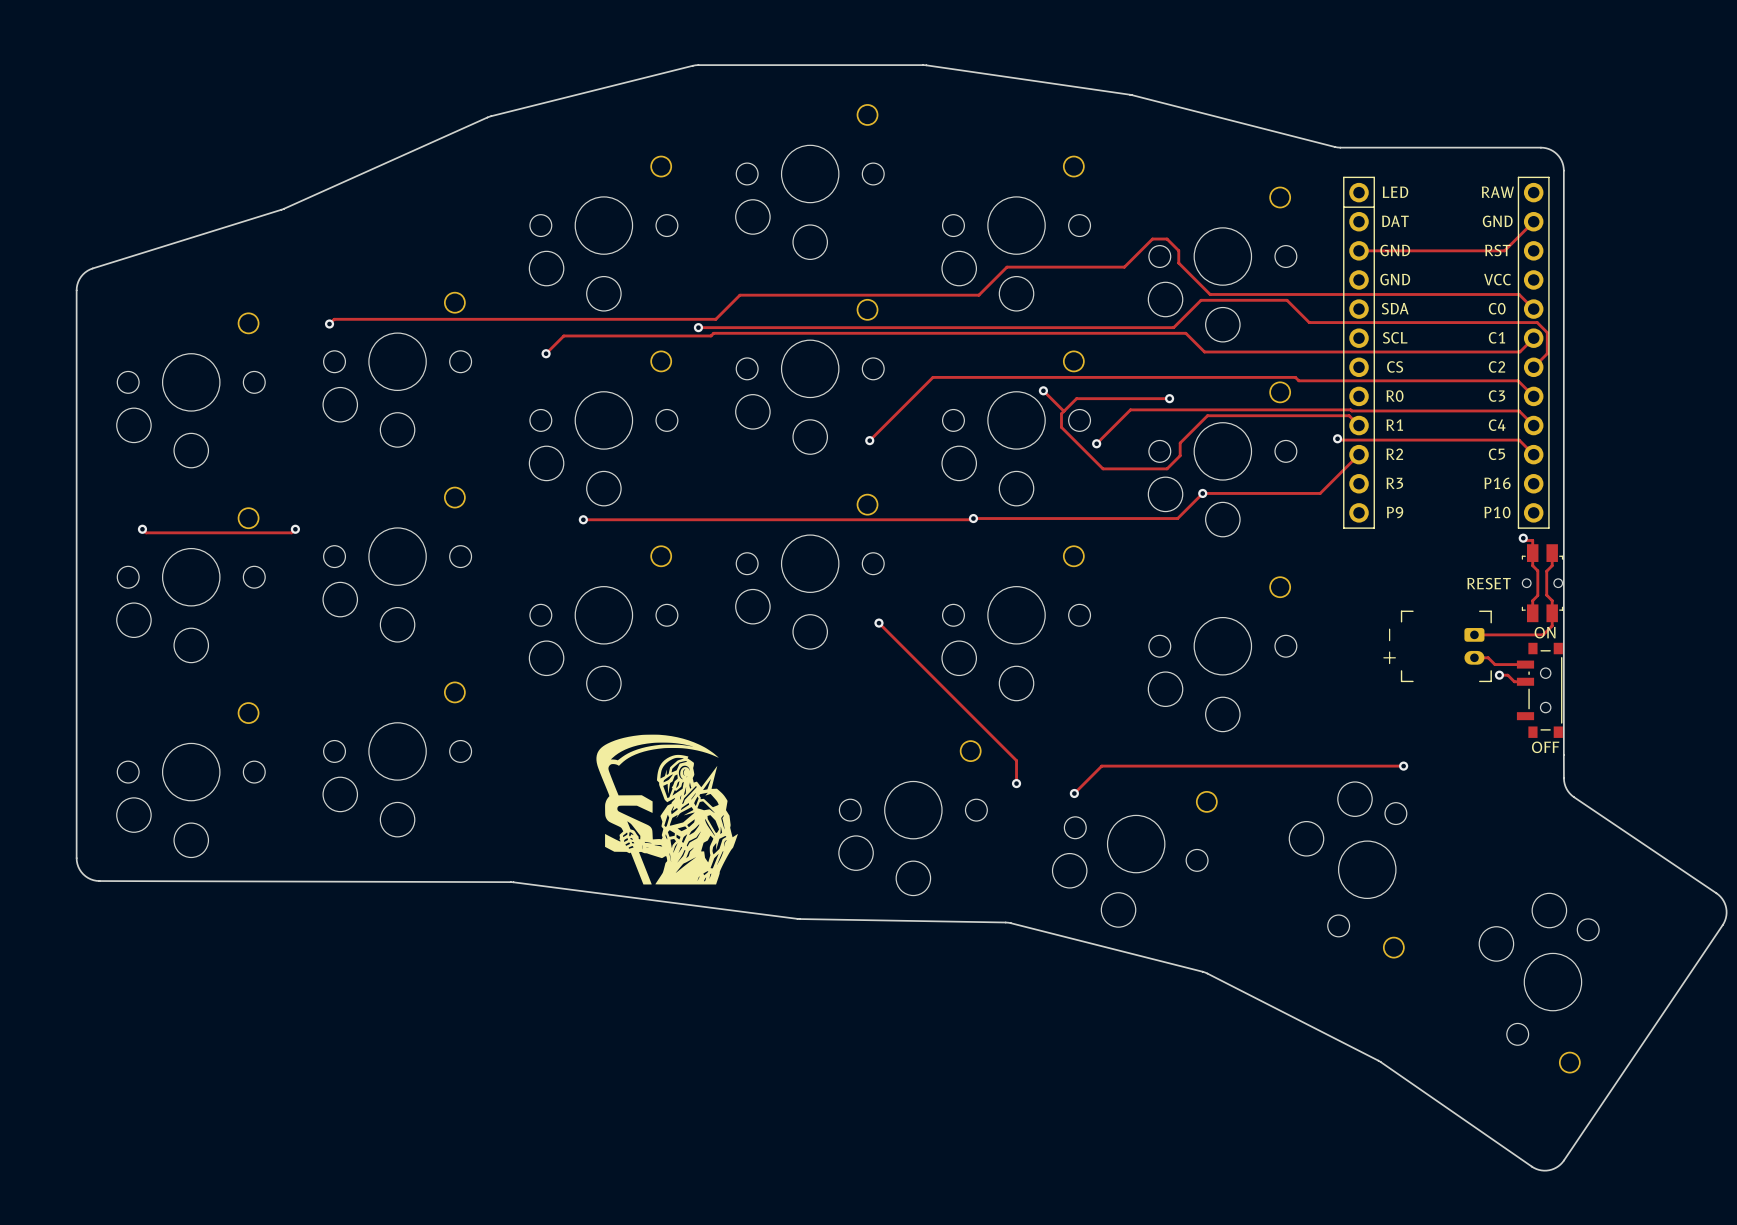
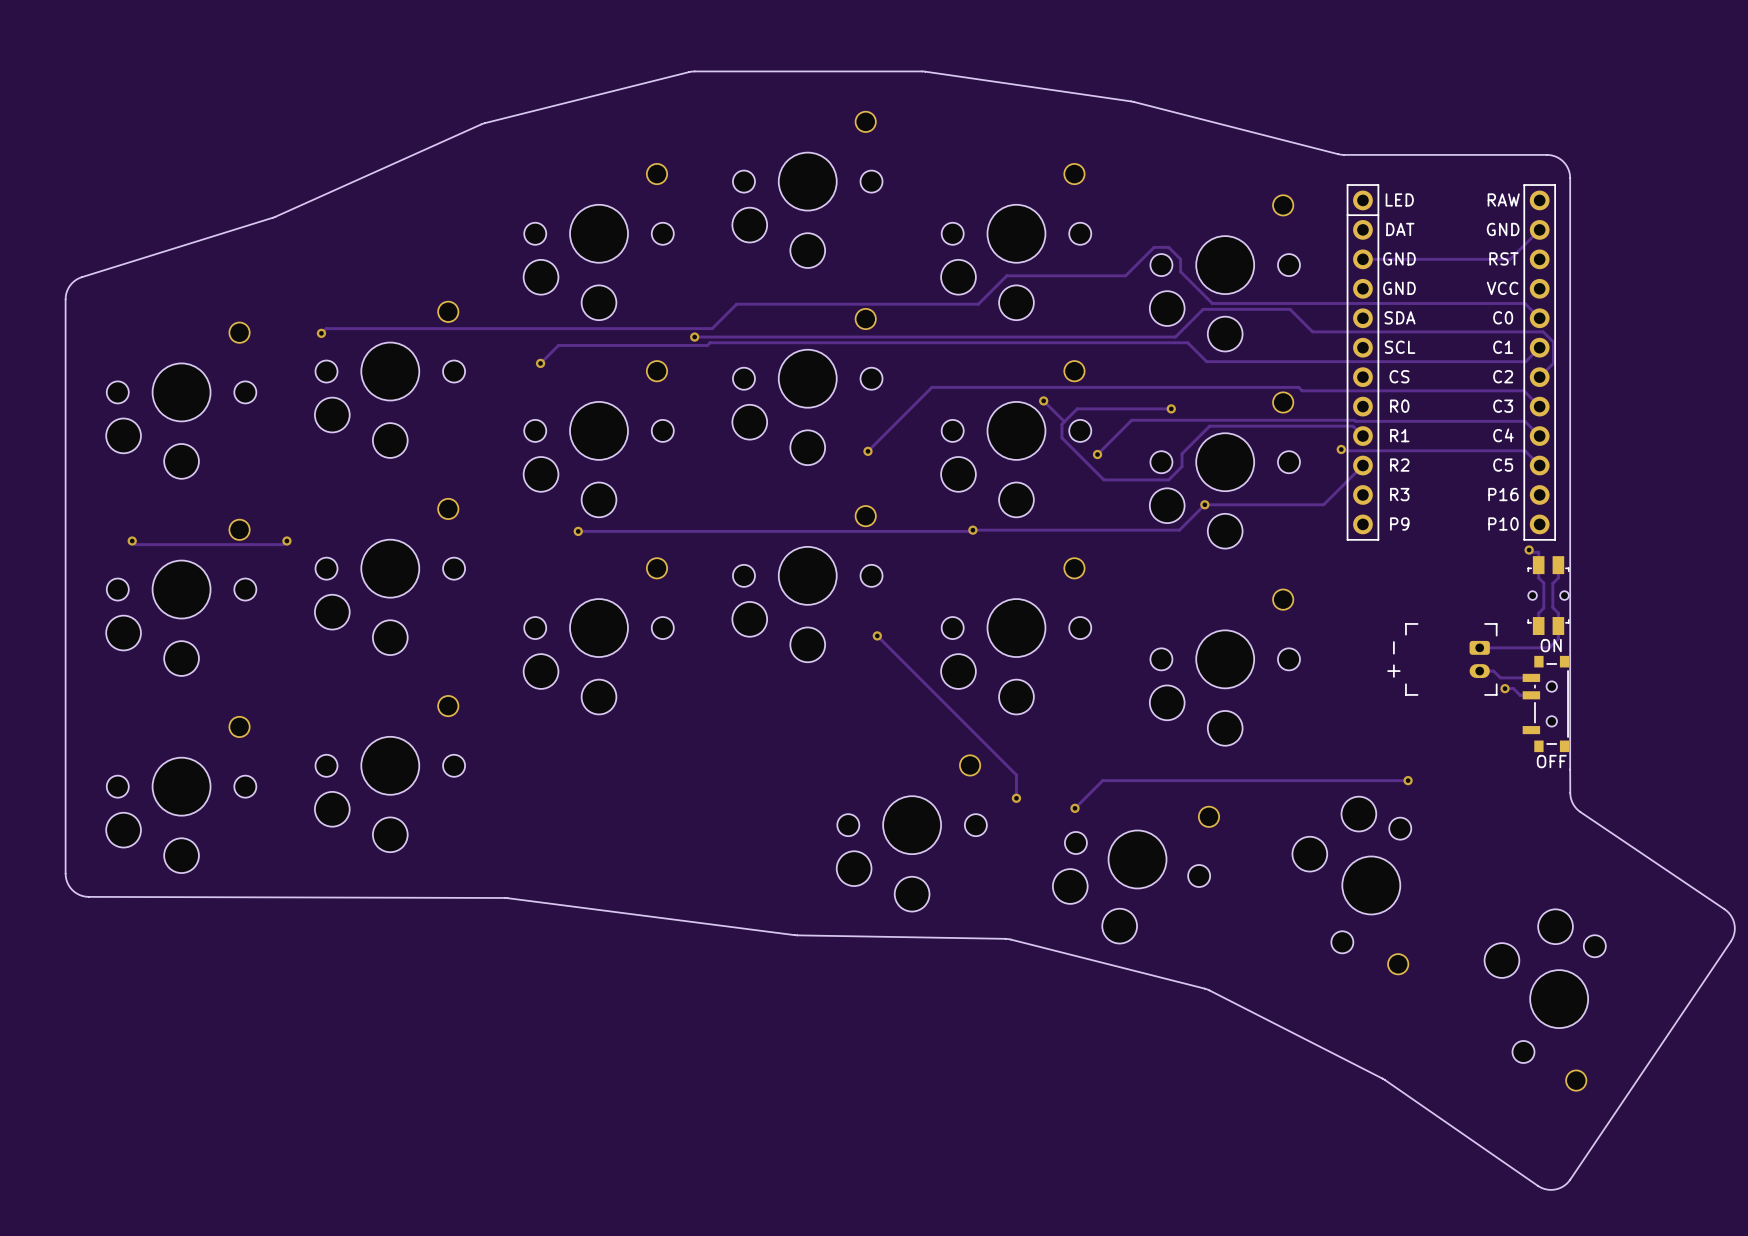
text: RESET (1489, 583) -> none
drawing: [596, 734, 738, 885] -> none

